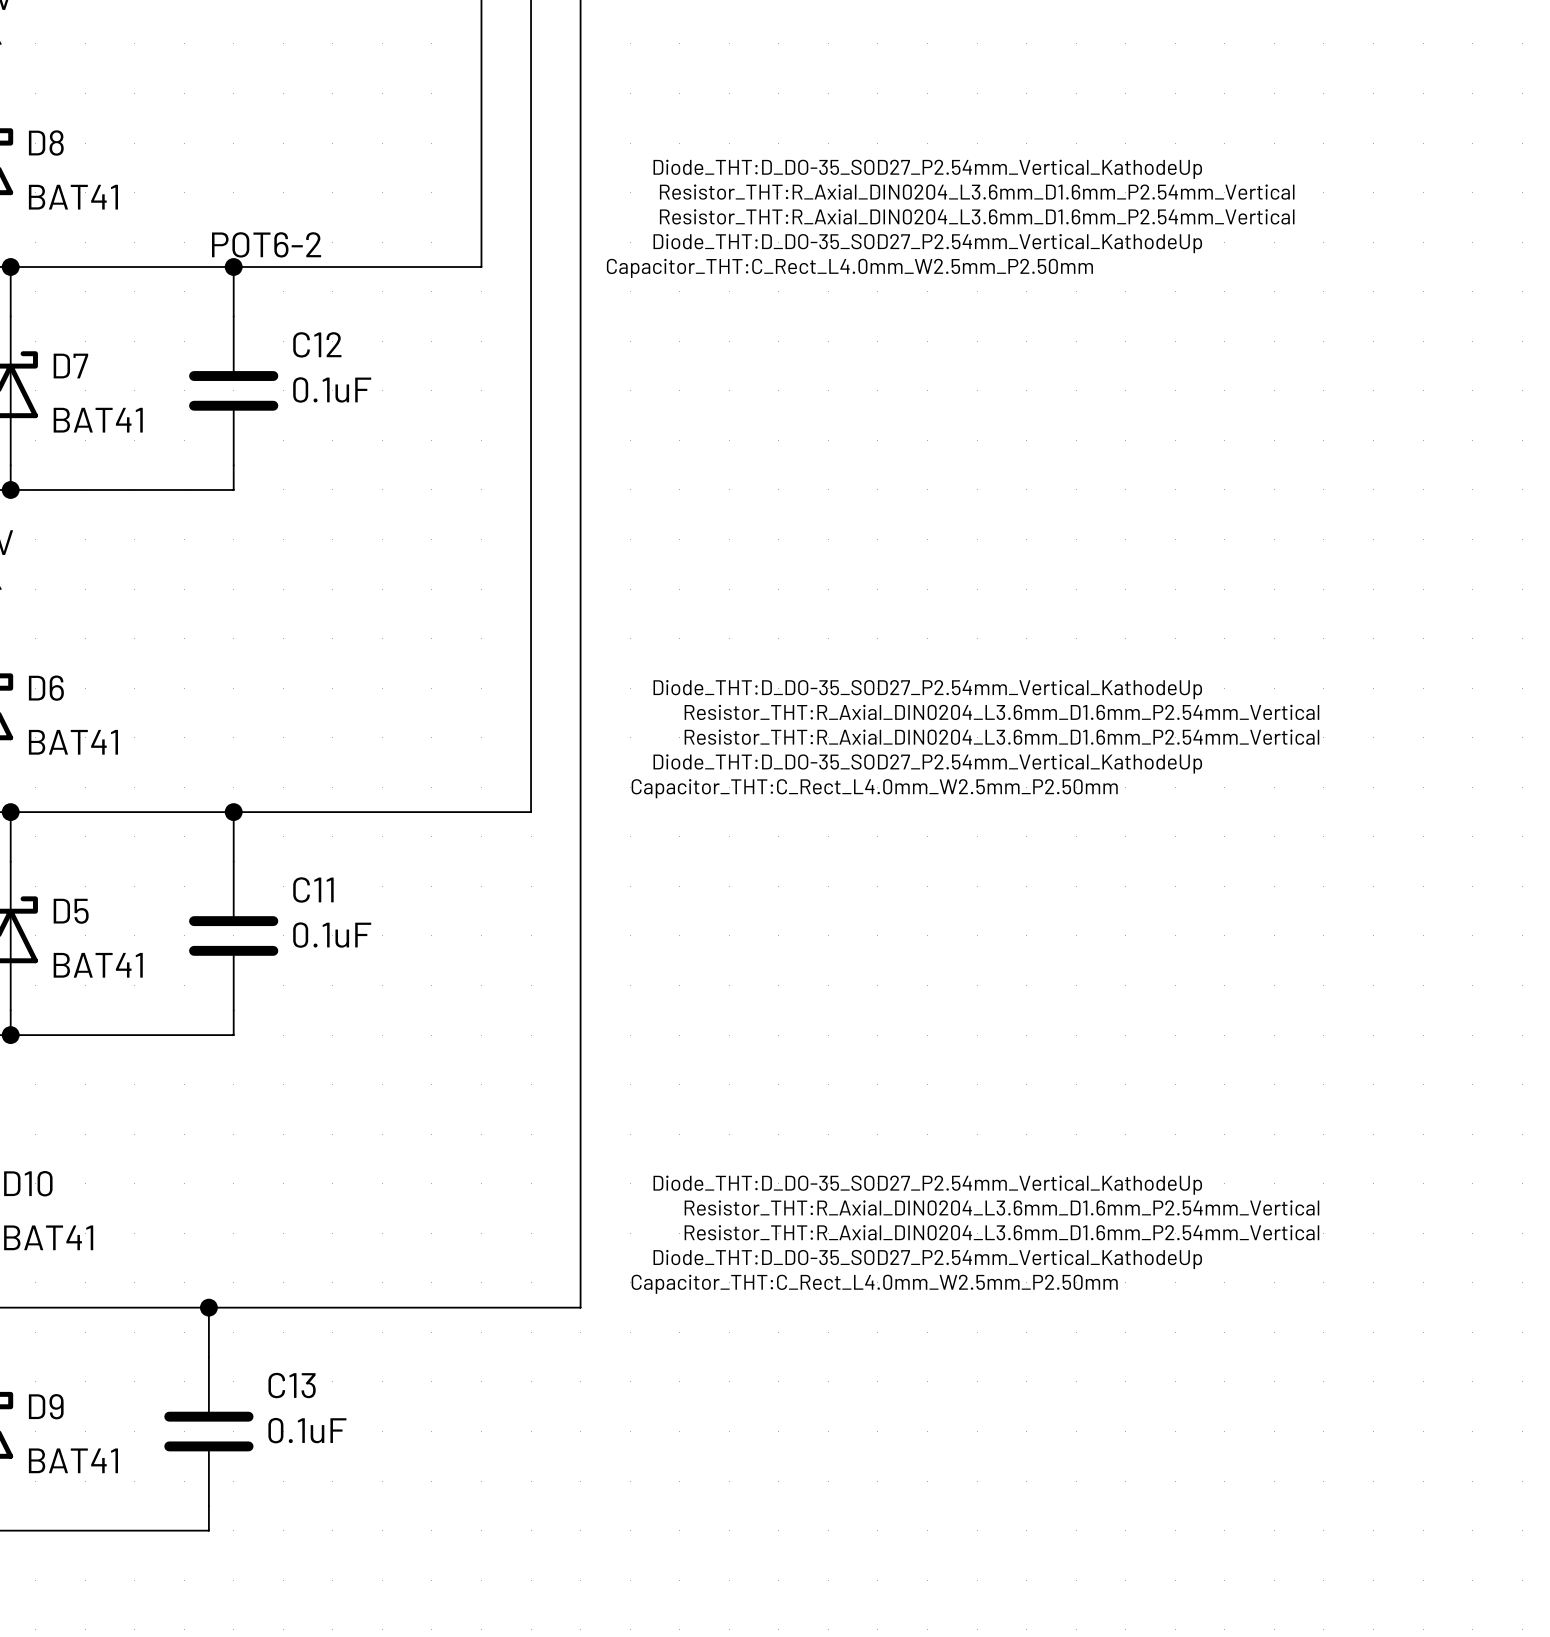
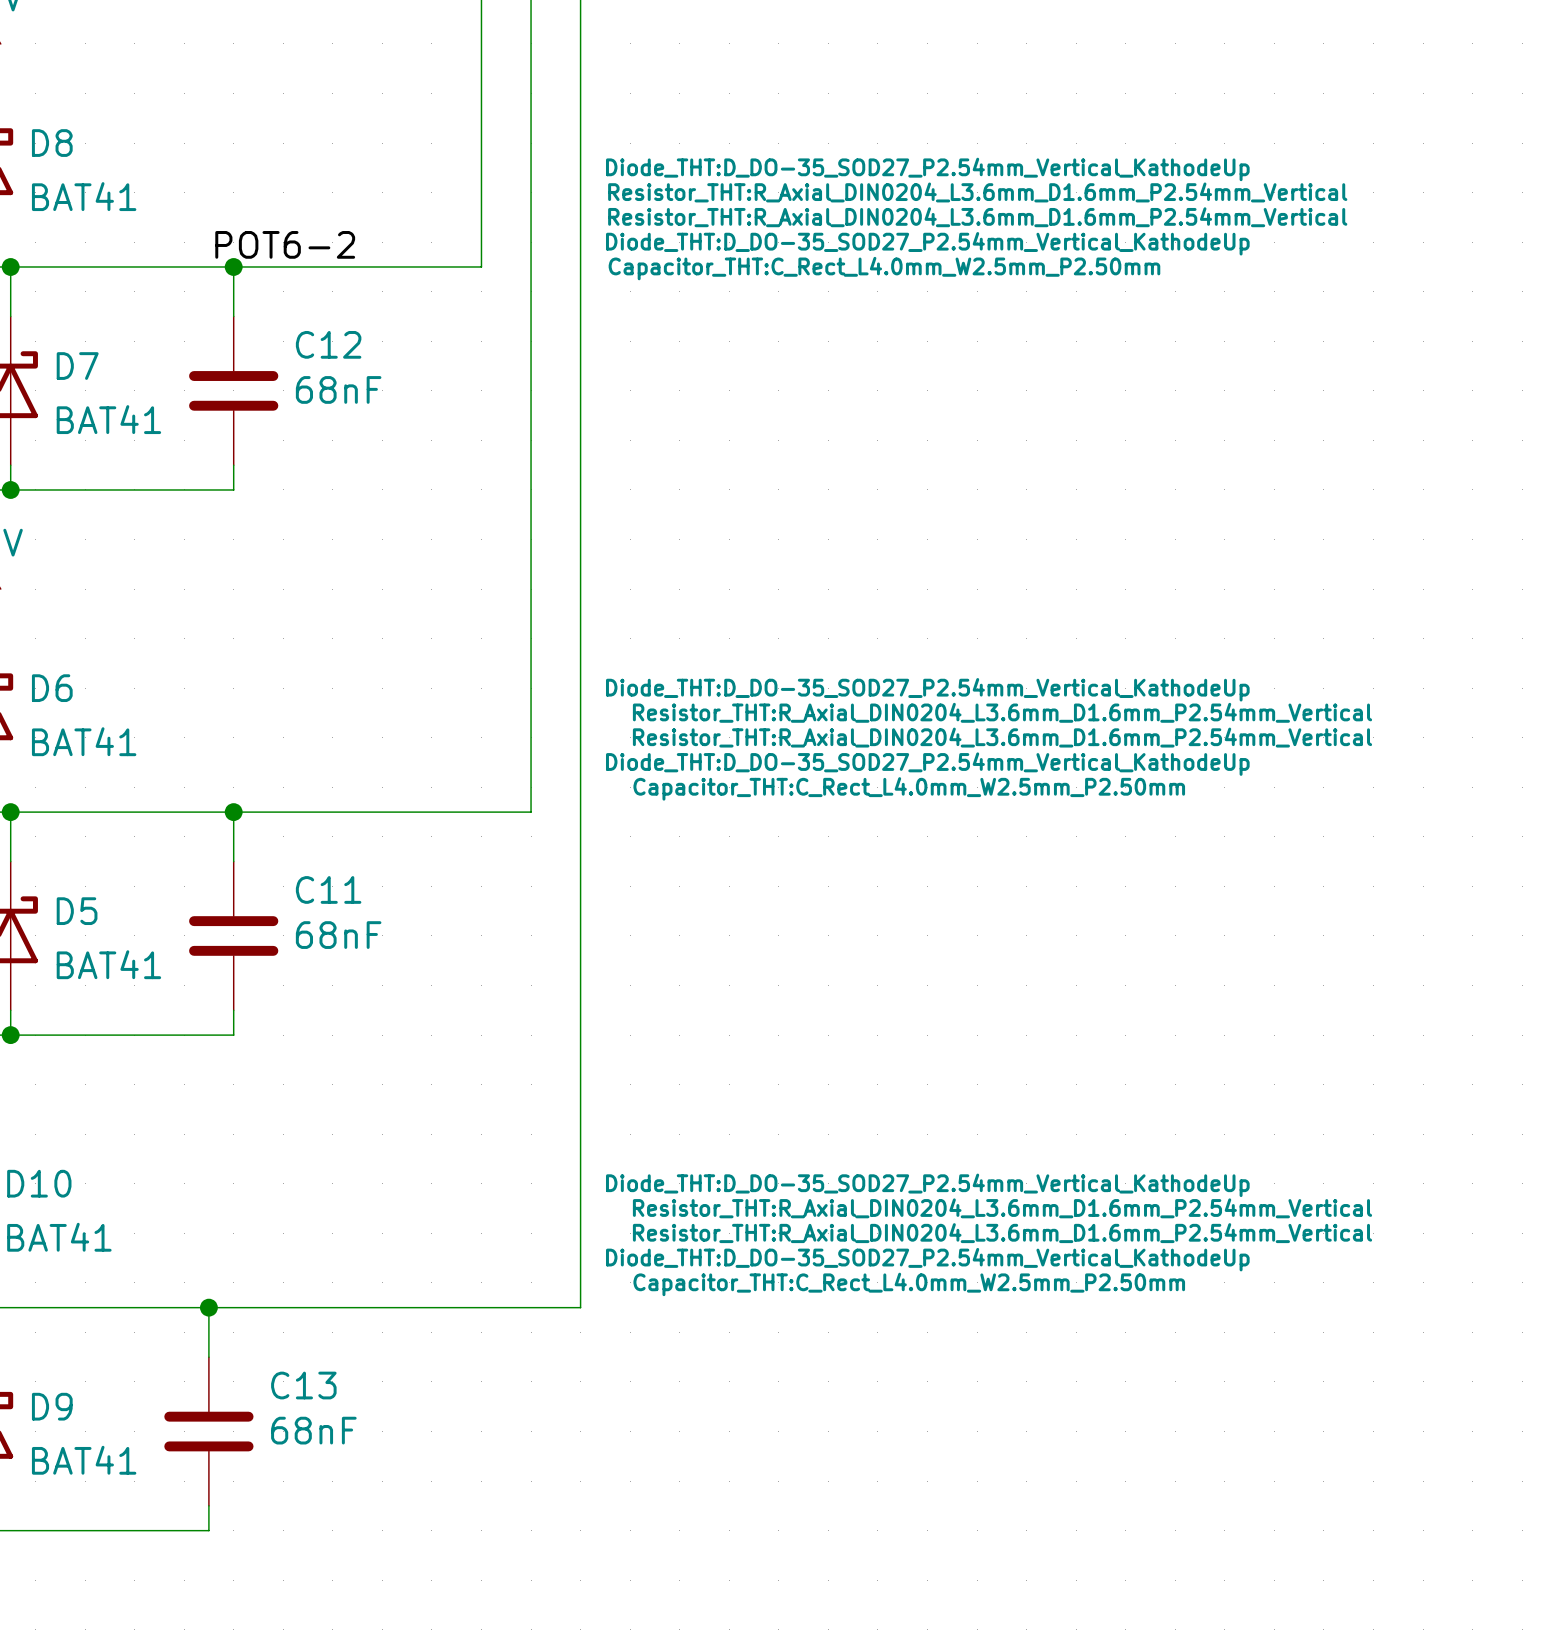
C12 value: 0.1uF (332, 389) -> 68nF (338, 389)
C11 value: 0.1uF (332, 935) -> 68nF (338, 935)
C13 value: 0.1uF (307, 1430) -> 68nF (313, 1430)

